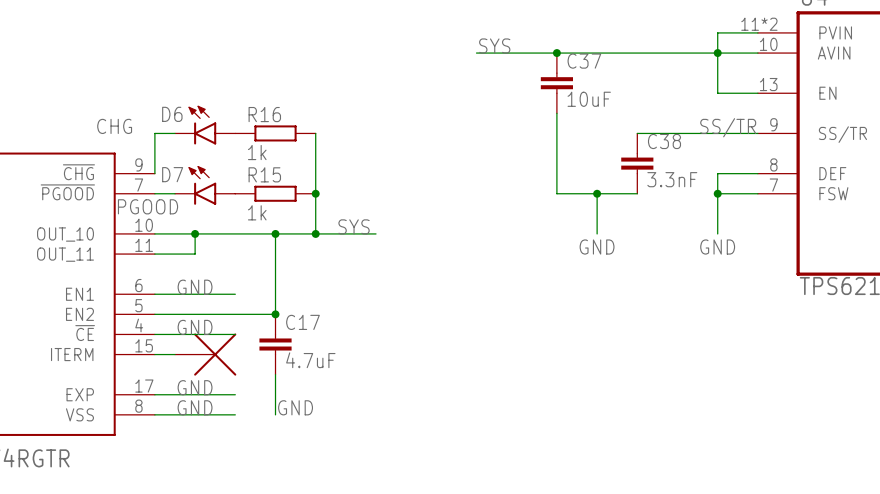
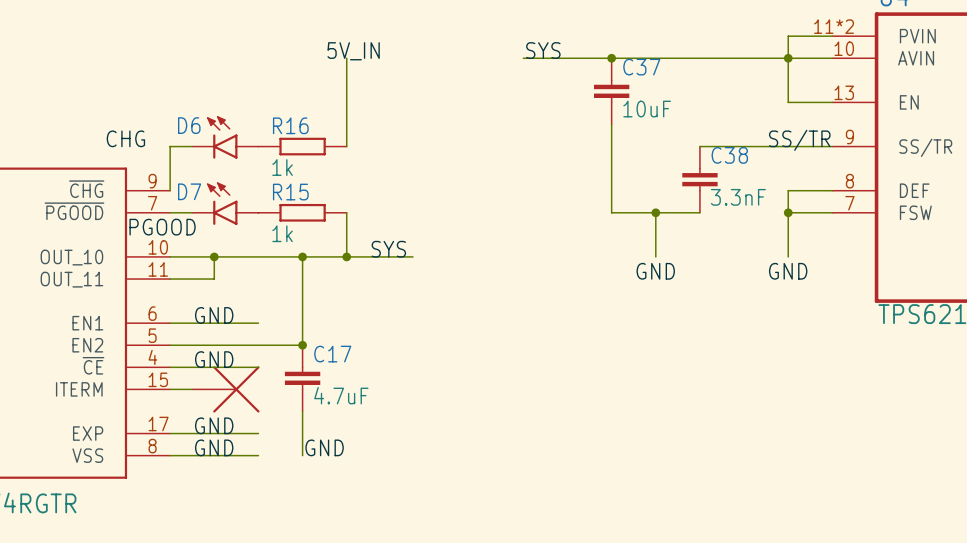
label: none -> 5V_IN (353, 51)
wire: (315, 133) (315, 193) -> (346, 146) (346, 58)
junction: (315, 193) -> none

